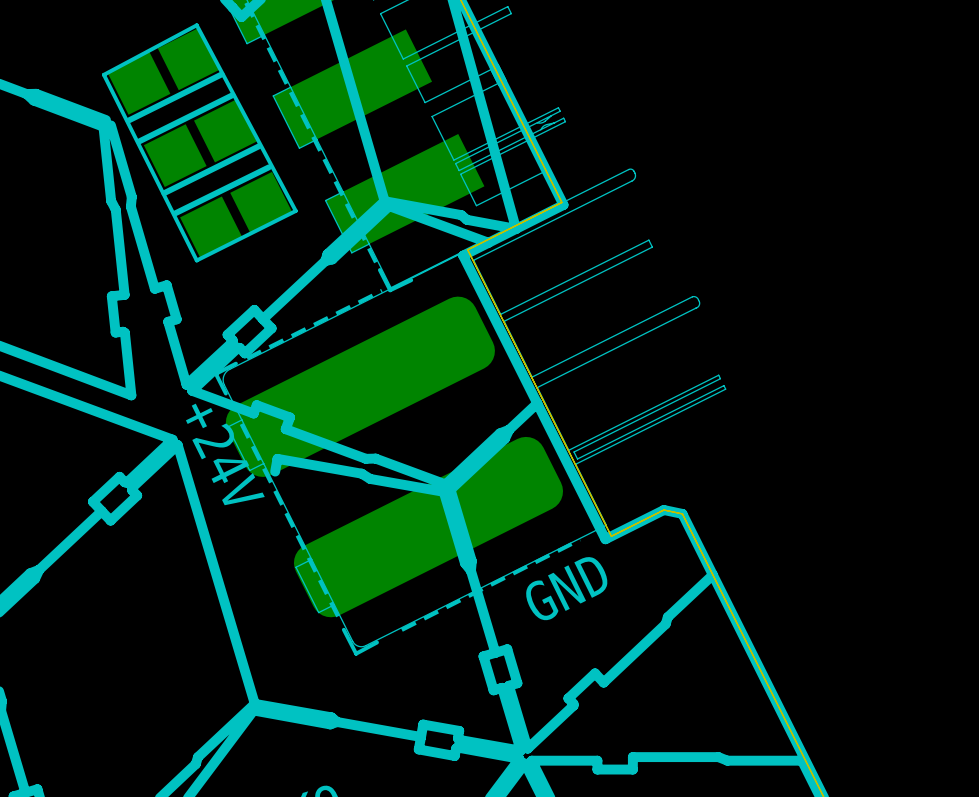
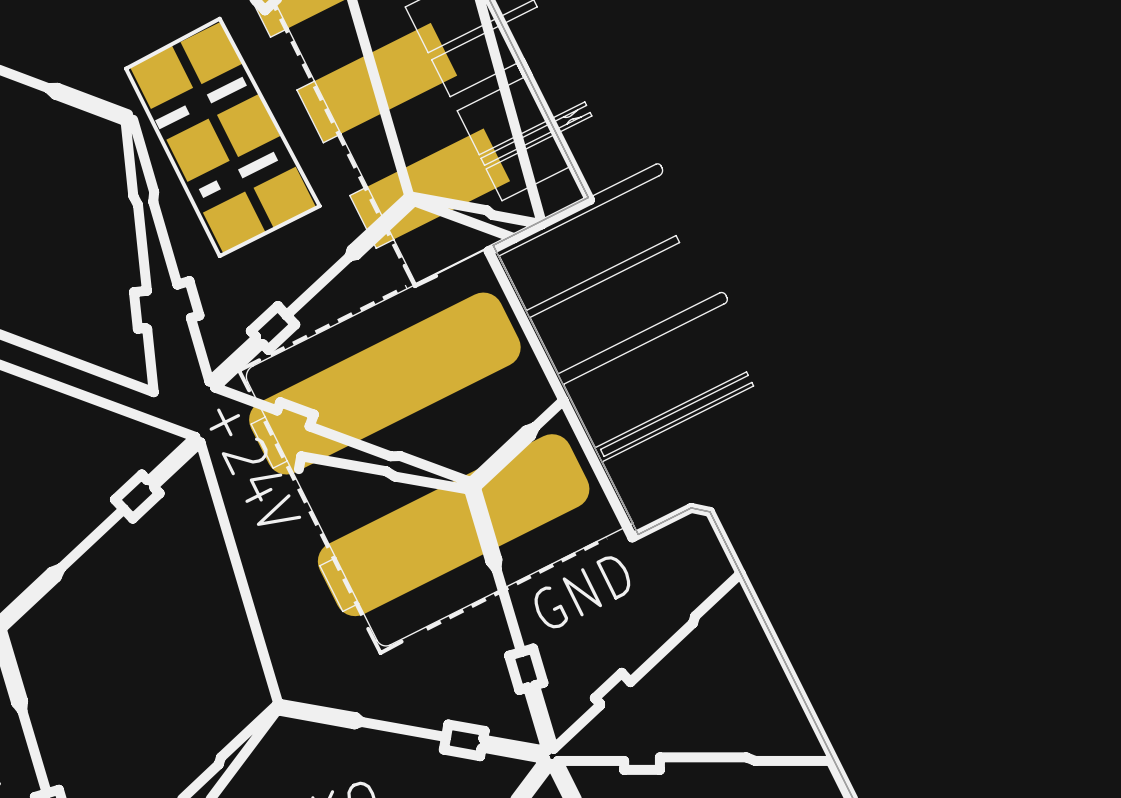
line: (221, 74) (128, 120) -> none
line: none -> (244, 81) (157, 124)
line: (232, 95) (139, 141) -> none
line: (259, 146) (164, 193) -> none
line: none -> (275, 156) (200, 193)
line: (268, 167) (174, 213) -> none

